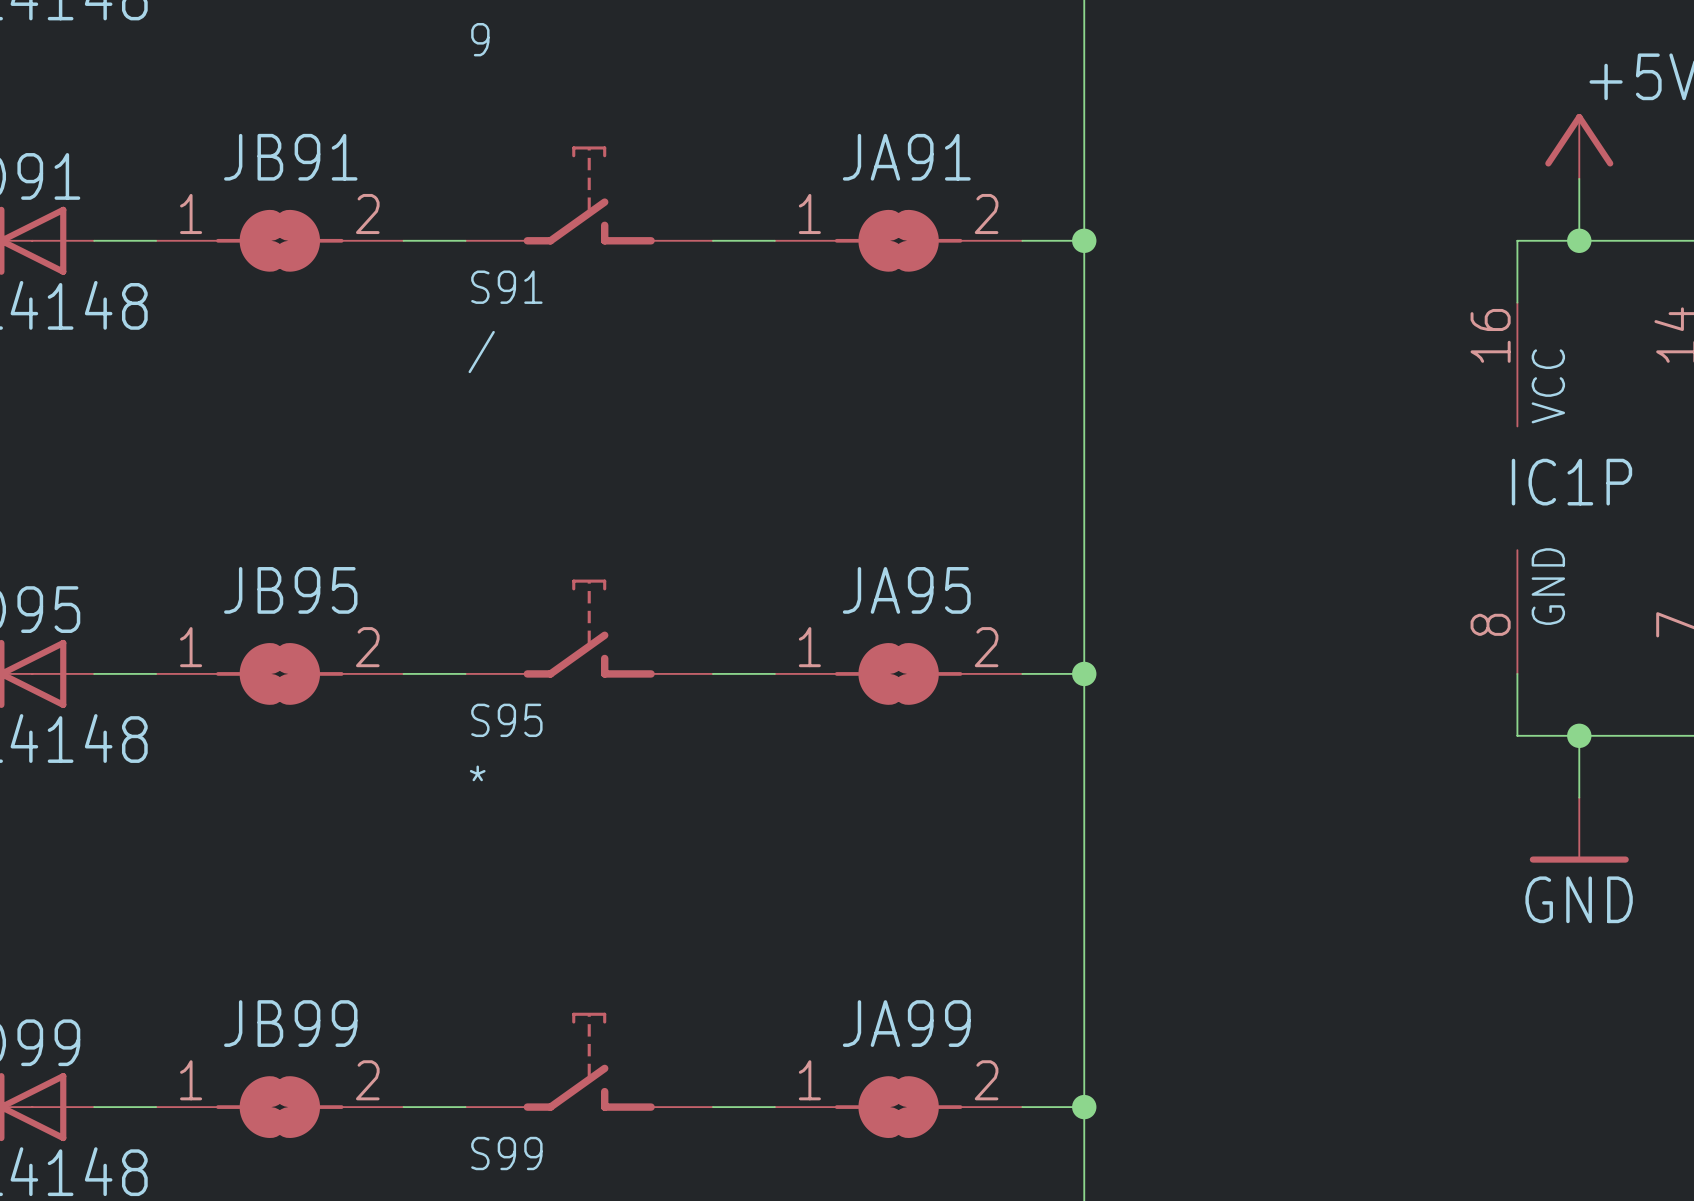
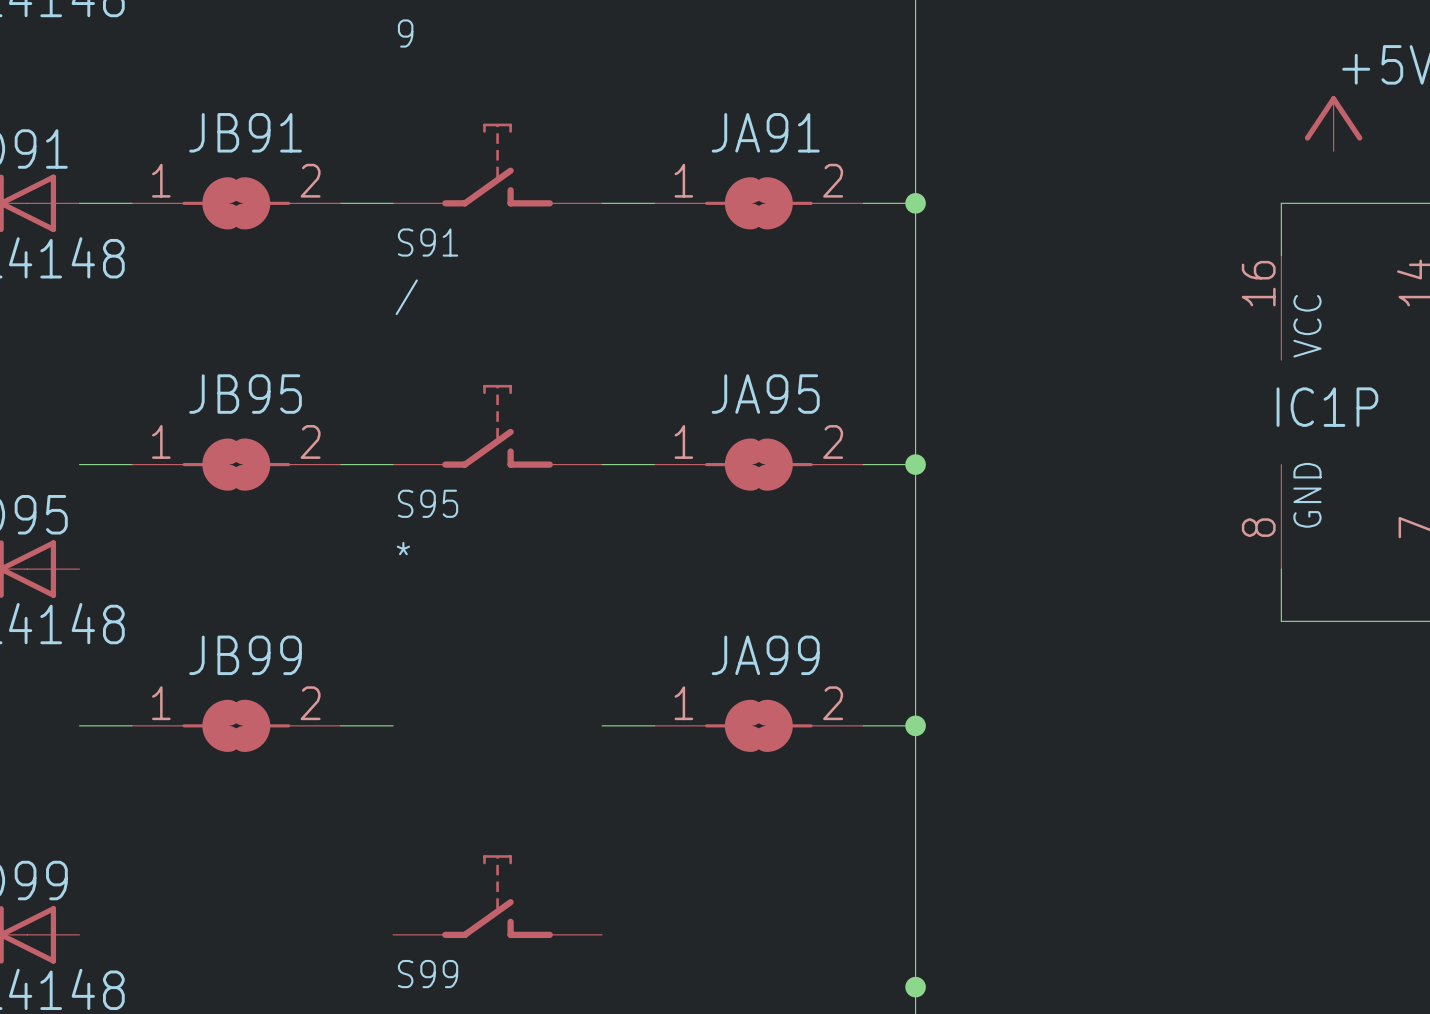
wire: (1579, 178) (1579, 240) -> none
junction: (1579, 240) -> none
junction: none -> (915, 464)
S95 position: (589, 628) -> (497, 426)
wire: (94, 673) (156, 673) -> (79, 464) (131, 464)
JB95 position: (279, 673) -> (236, 464)
wire: (403, 673) (465, 673) -> (340, 464) (393, 464)
wire: (712, 673) (774, 673) -> (602, 464) (654, 464)
JA95 position: (898, 673) -> (758, 464)
wire: (1022, 673) (1084, 673) -> (863, 464) (915, 464)
junction: (1084, 673) -> none
wire: (1579, 735) (1579, 797) -> none
junction: (1579, 735) -> none
power symbol: GND (1579, 830) -> none
junction: none -> (915, 725)
wire: (94, 1107) (156, 1107) -> (79, 725) (131, 725)
JB99 position: (279, 1107) -> (236, 725)
wire: (403, 1107) (465, 1107) -> (340, 725) (393, 725)
wire: (712, 1107) (774, 1107) -> (602, 725) (654, 725)
JA99 position: (898, 1107) -> (758, 725)
wire: (1022, 1107) (1084, 1107) -> (863, 725) (915, 725)
junction position: (1084, 1107) -> (915, 987)

